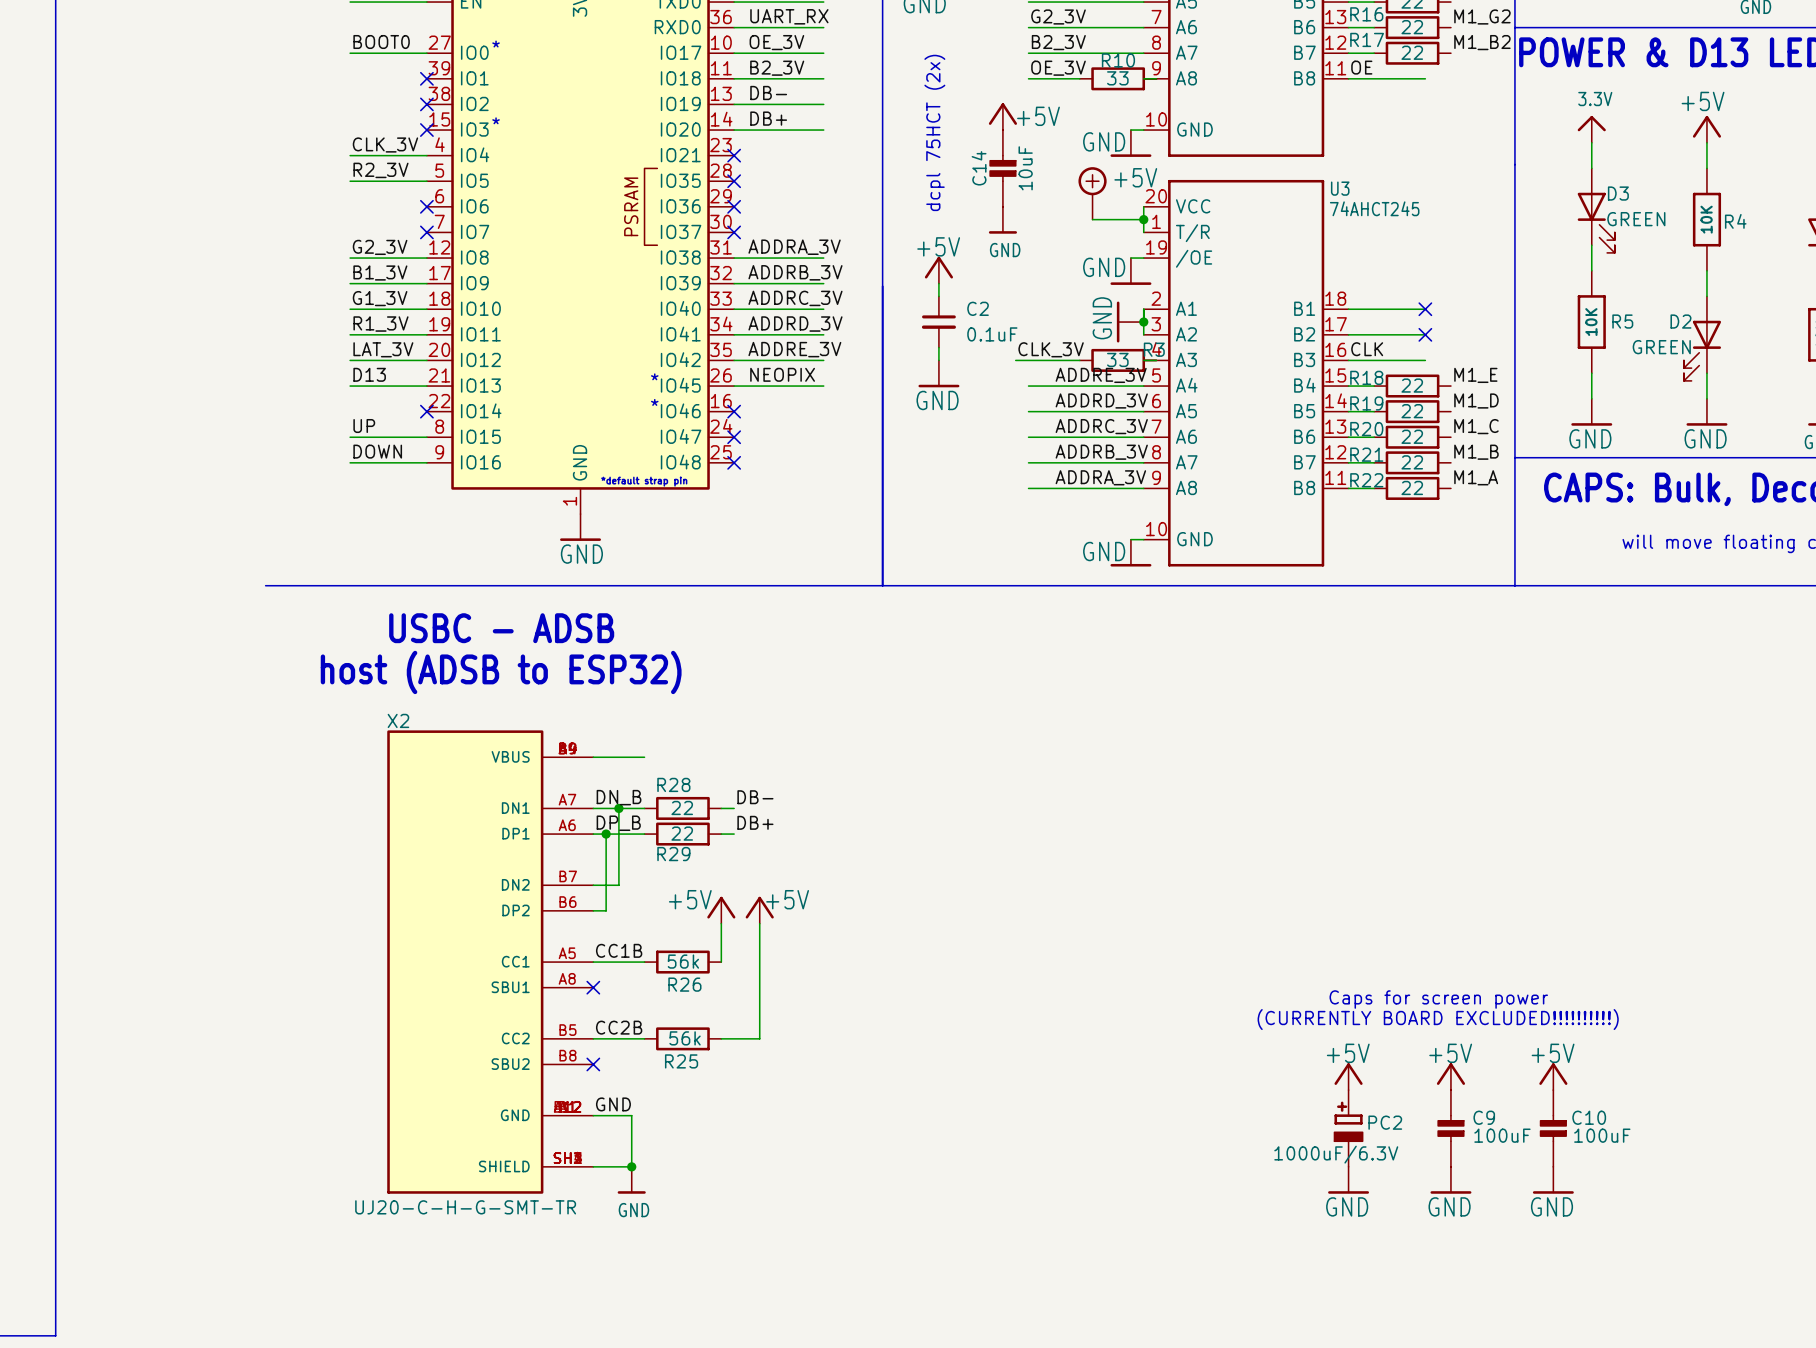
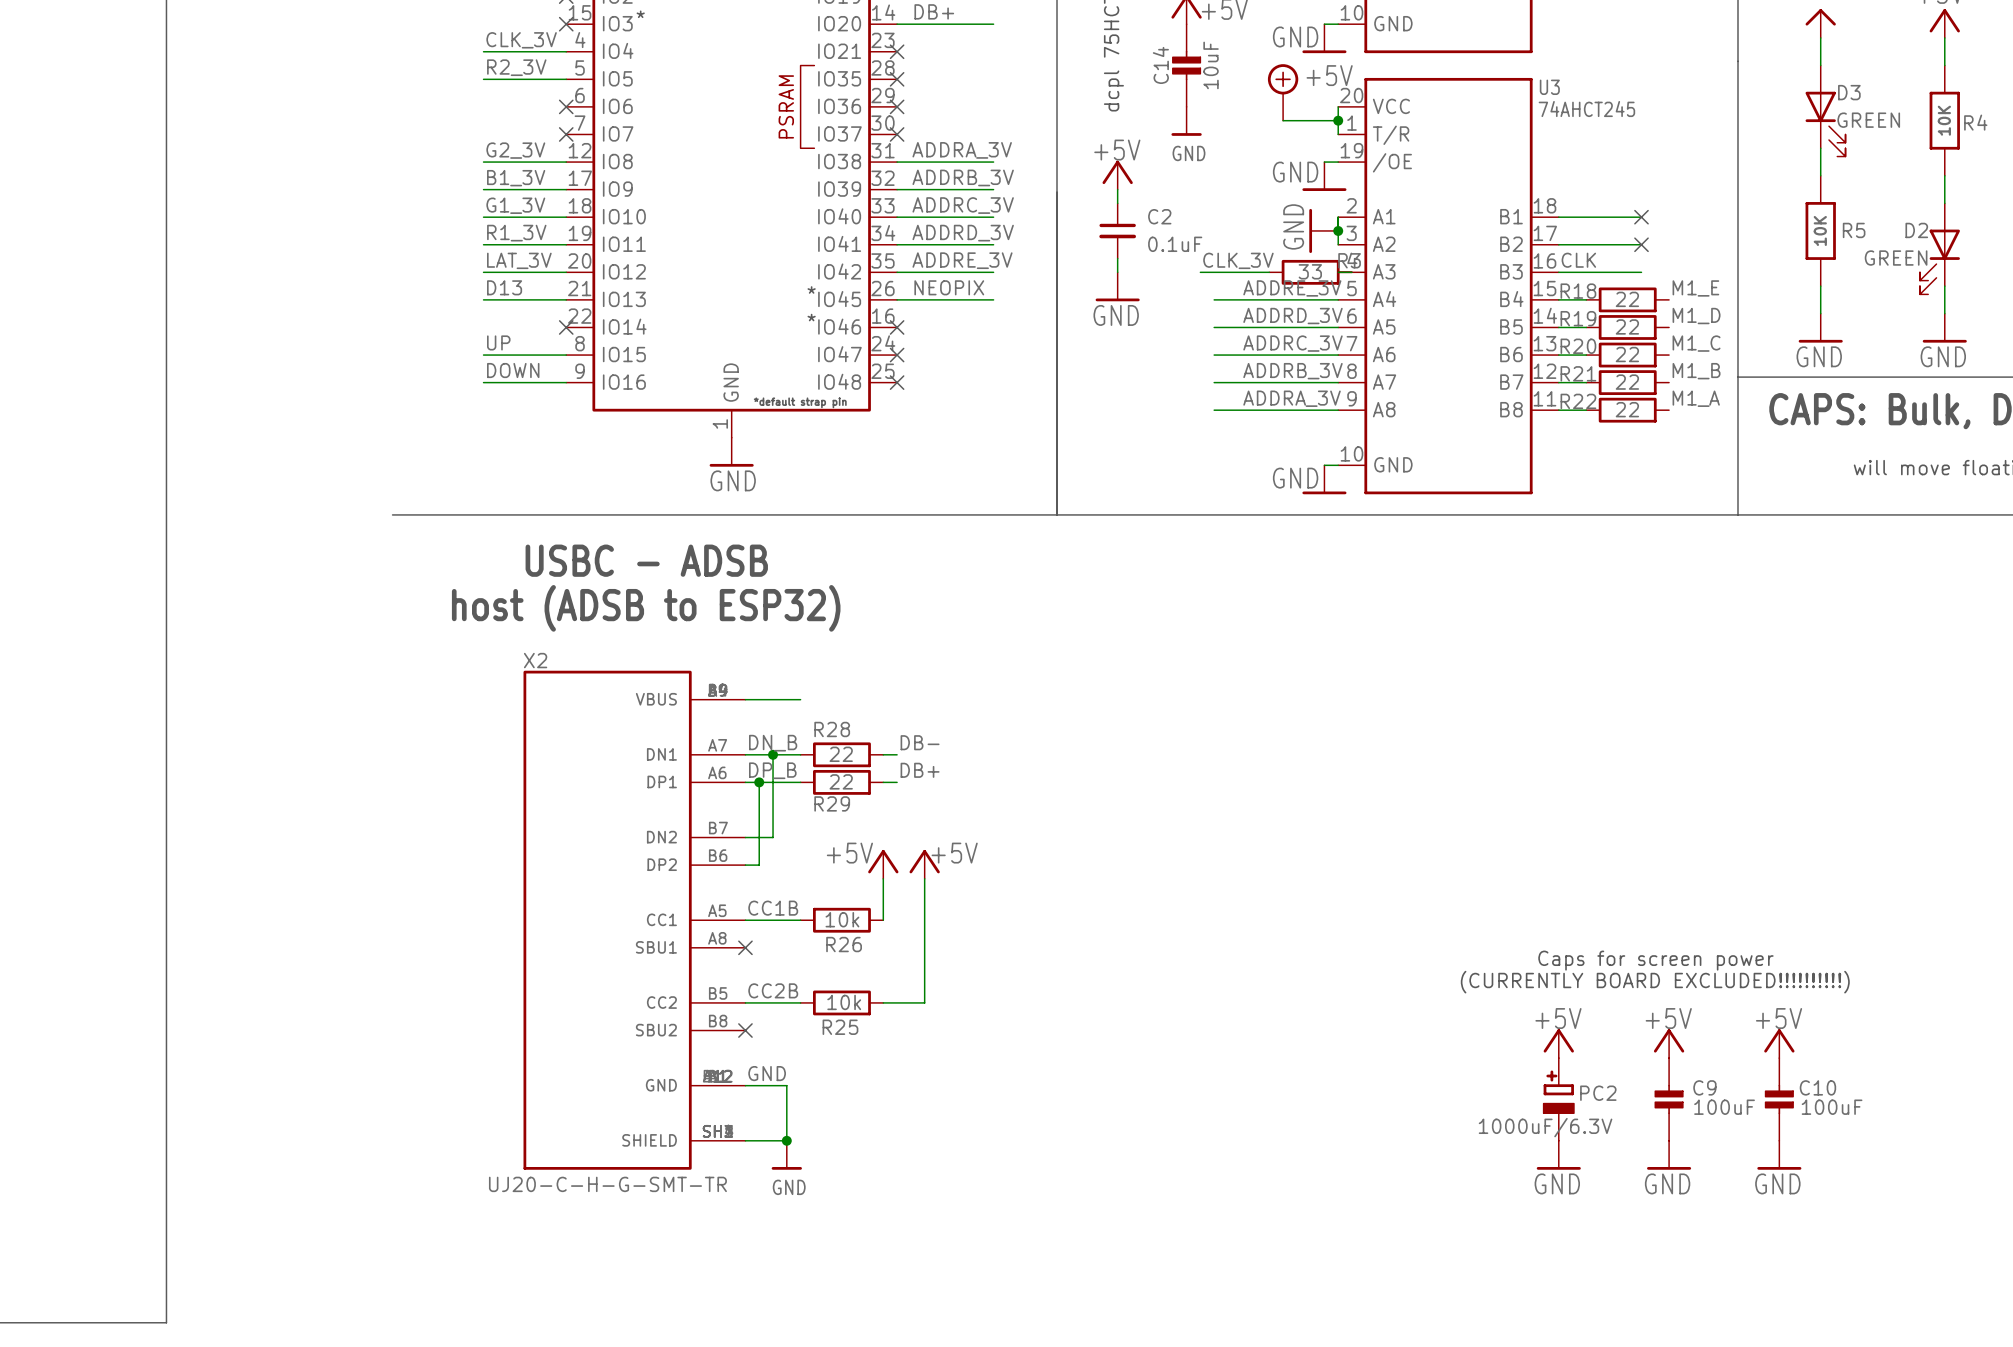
R26 value: 56k (683, 961) -> 10k (842, 919)
R25 value: 56k (685, 1038) -> 10k (844, 1002)

